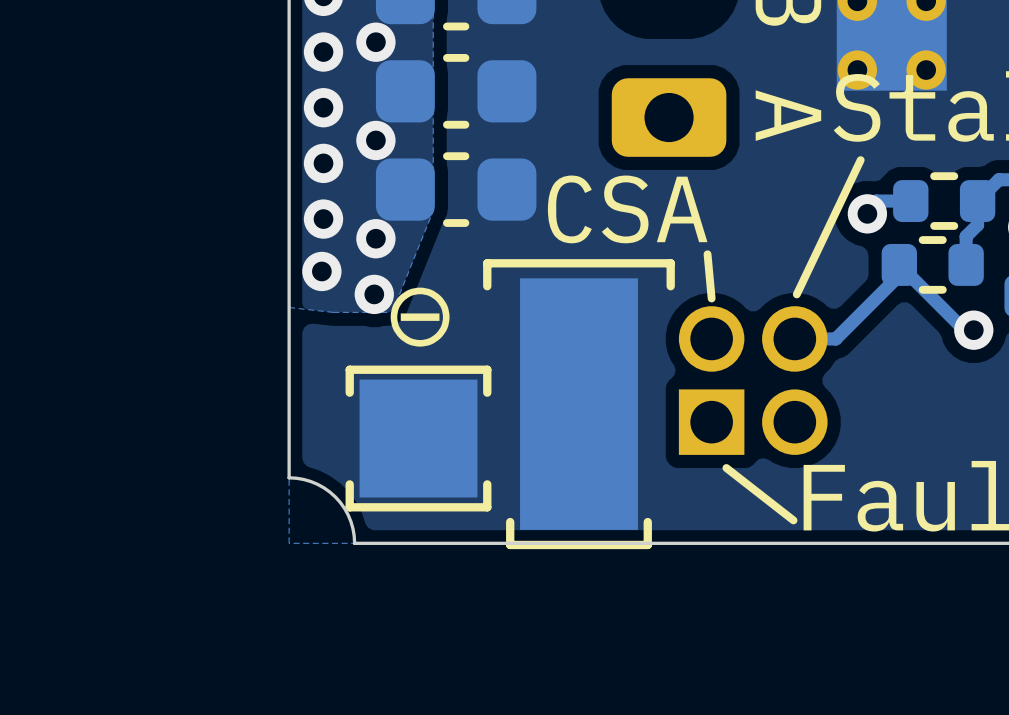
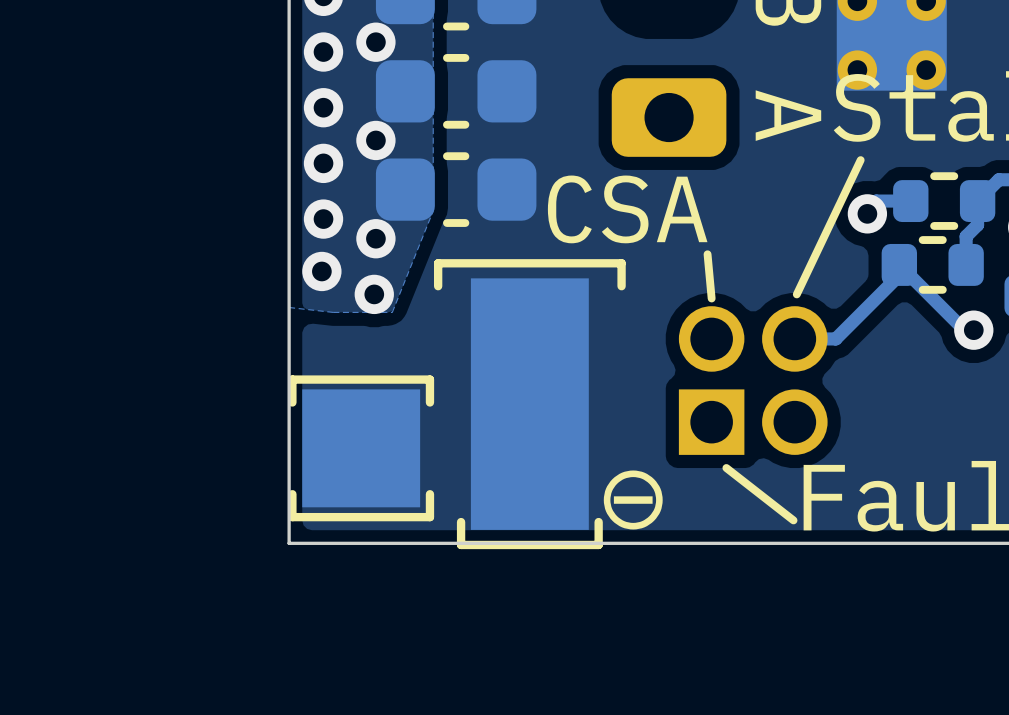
text position: ⊖ (420, 317) -> ⊖ (633, 499)
part position: (578, 404) -> (529, 404)
part position: (418, 438) -> (361, 448)
board edge: (289, 477) (310, 481) (323, 487) (335, 497) (344, 508) (350, 521) (354, 543) -> (289, 477) (289, 543) (354, 543)

